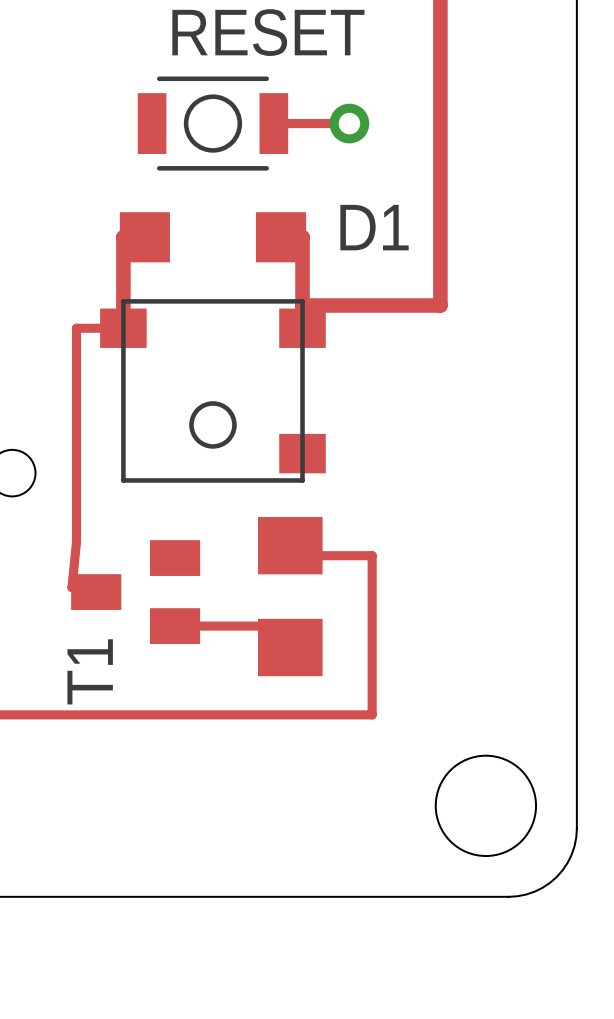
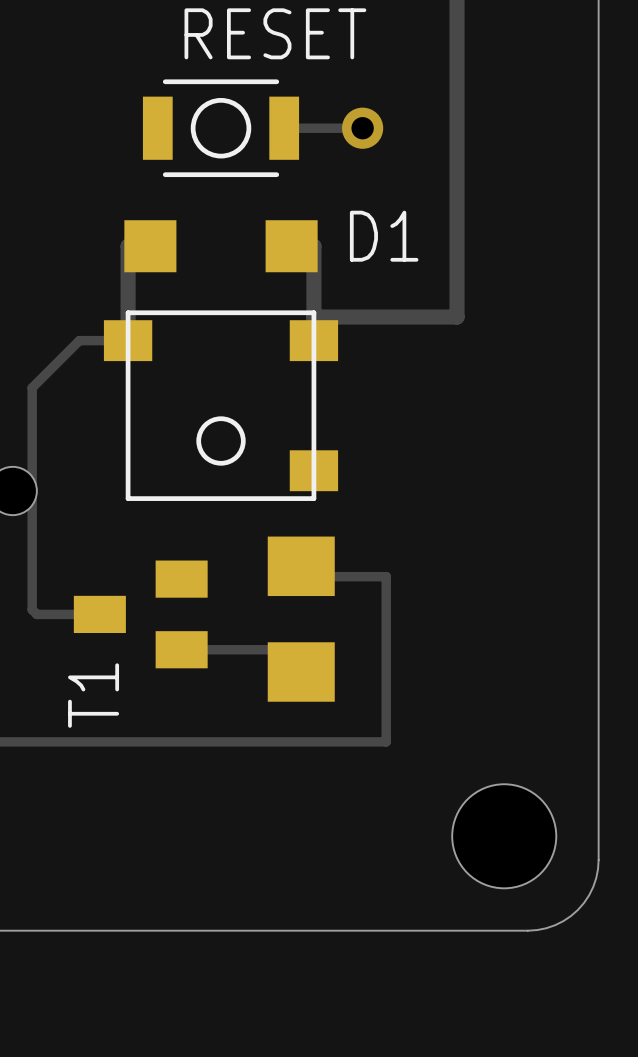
track: (76, 328) (76, 542) (71, 587) (96, 592) -> (79, 340) (32, 387) (32, 609) (36, 614) (99, 614)

